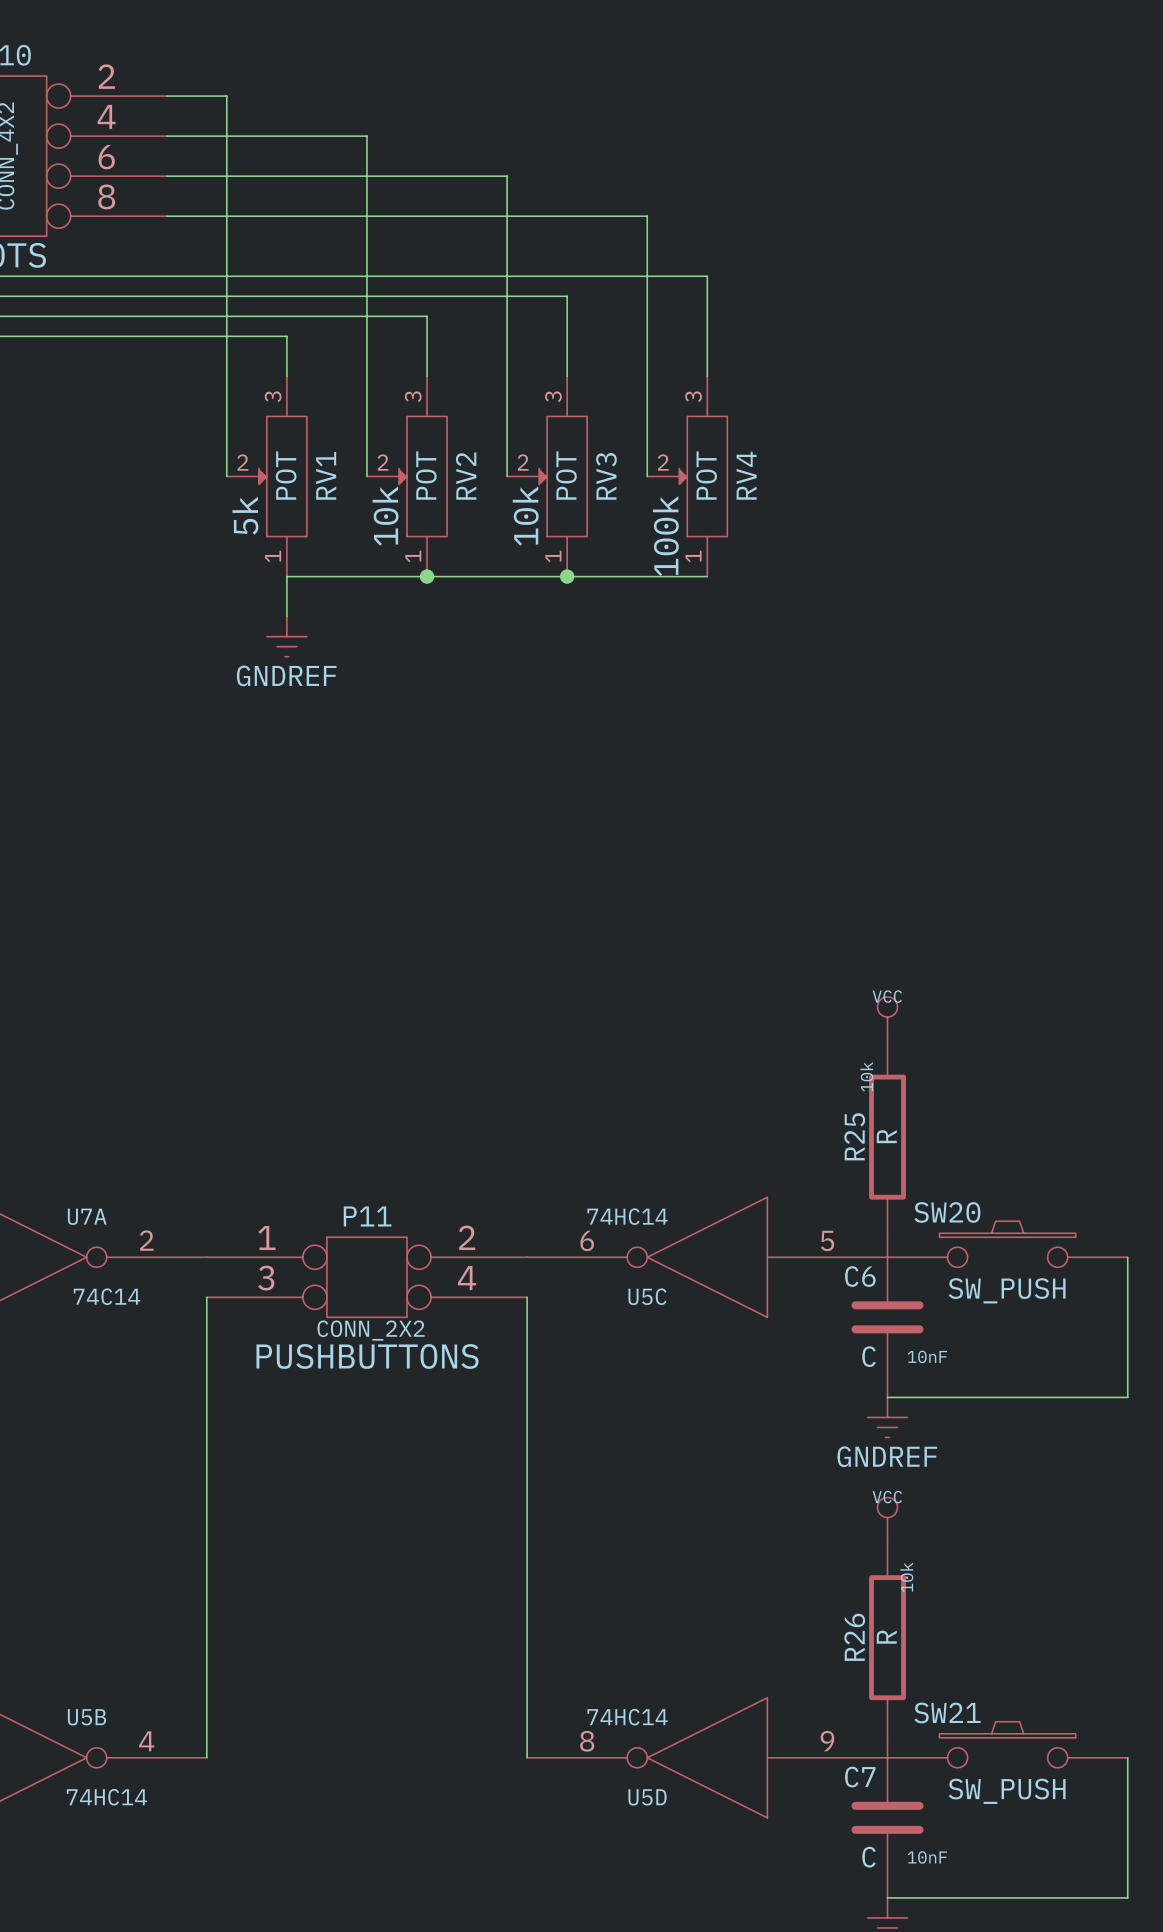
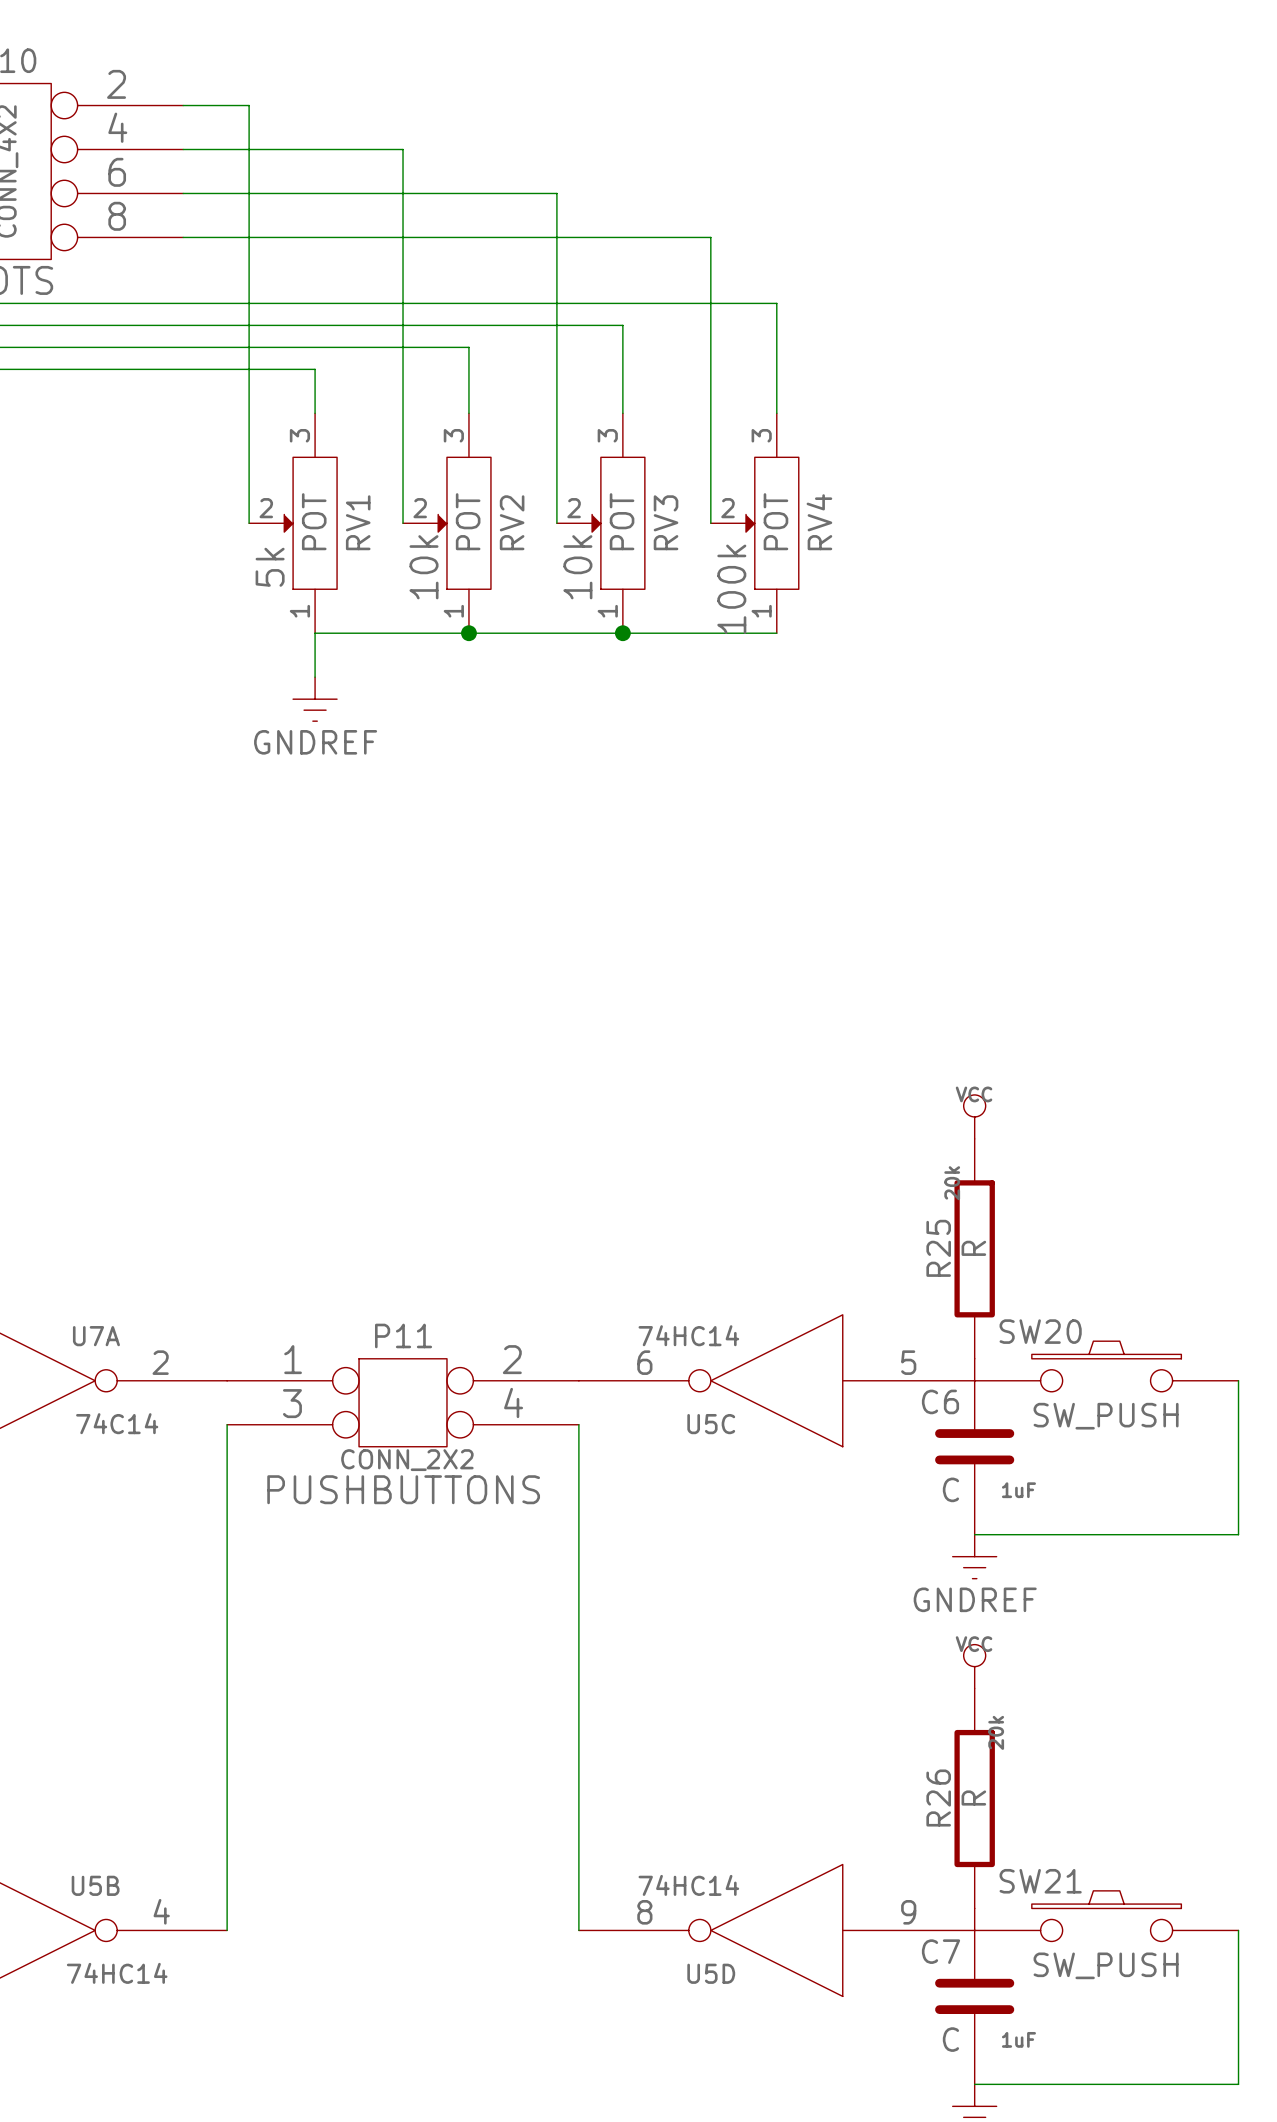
R25 text: 10k (866, 1076) -> 20k (952, 1183)
C6 text: 10nF (927, 1356) -> 1uF (1018, 1490)
R26 text: 10k (906, 1577) -> 20k (996, 1732)
C7 text: 10nF (927, 1857) -> 1uF (1018, 2039)

